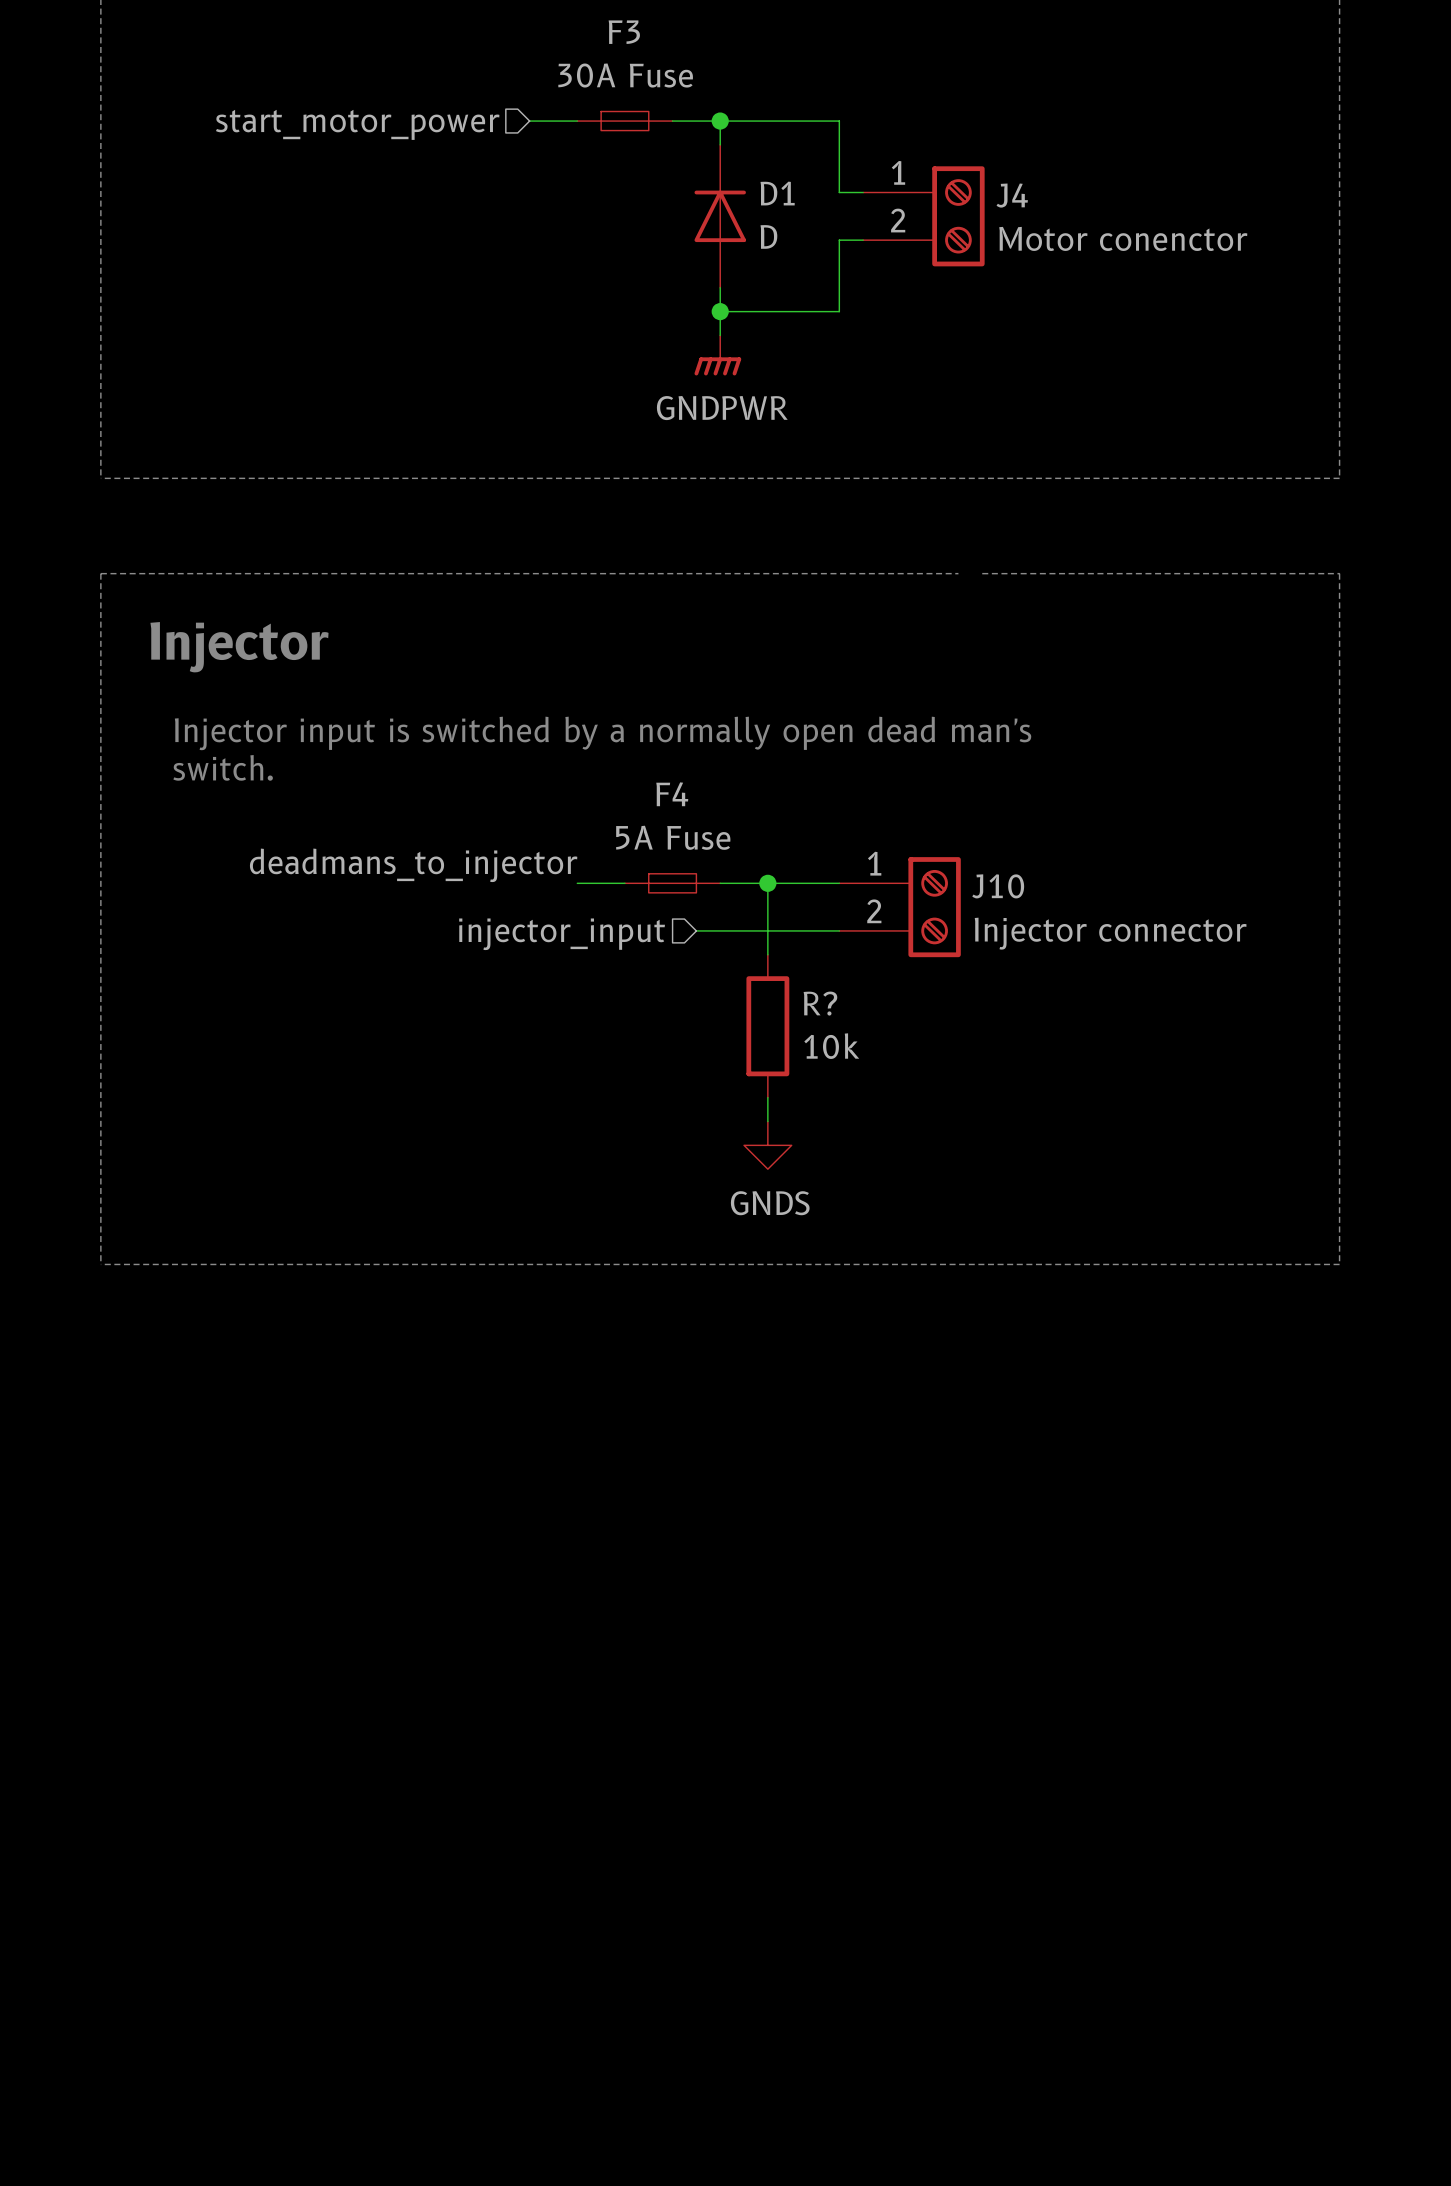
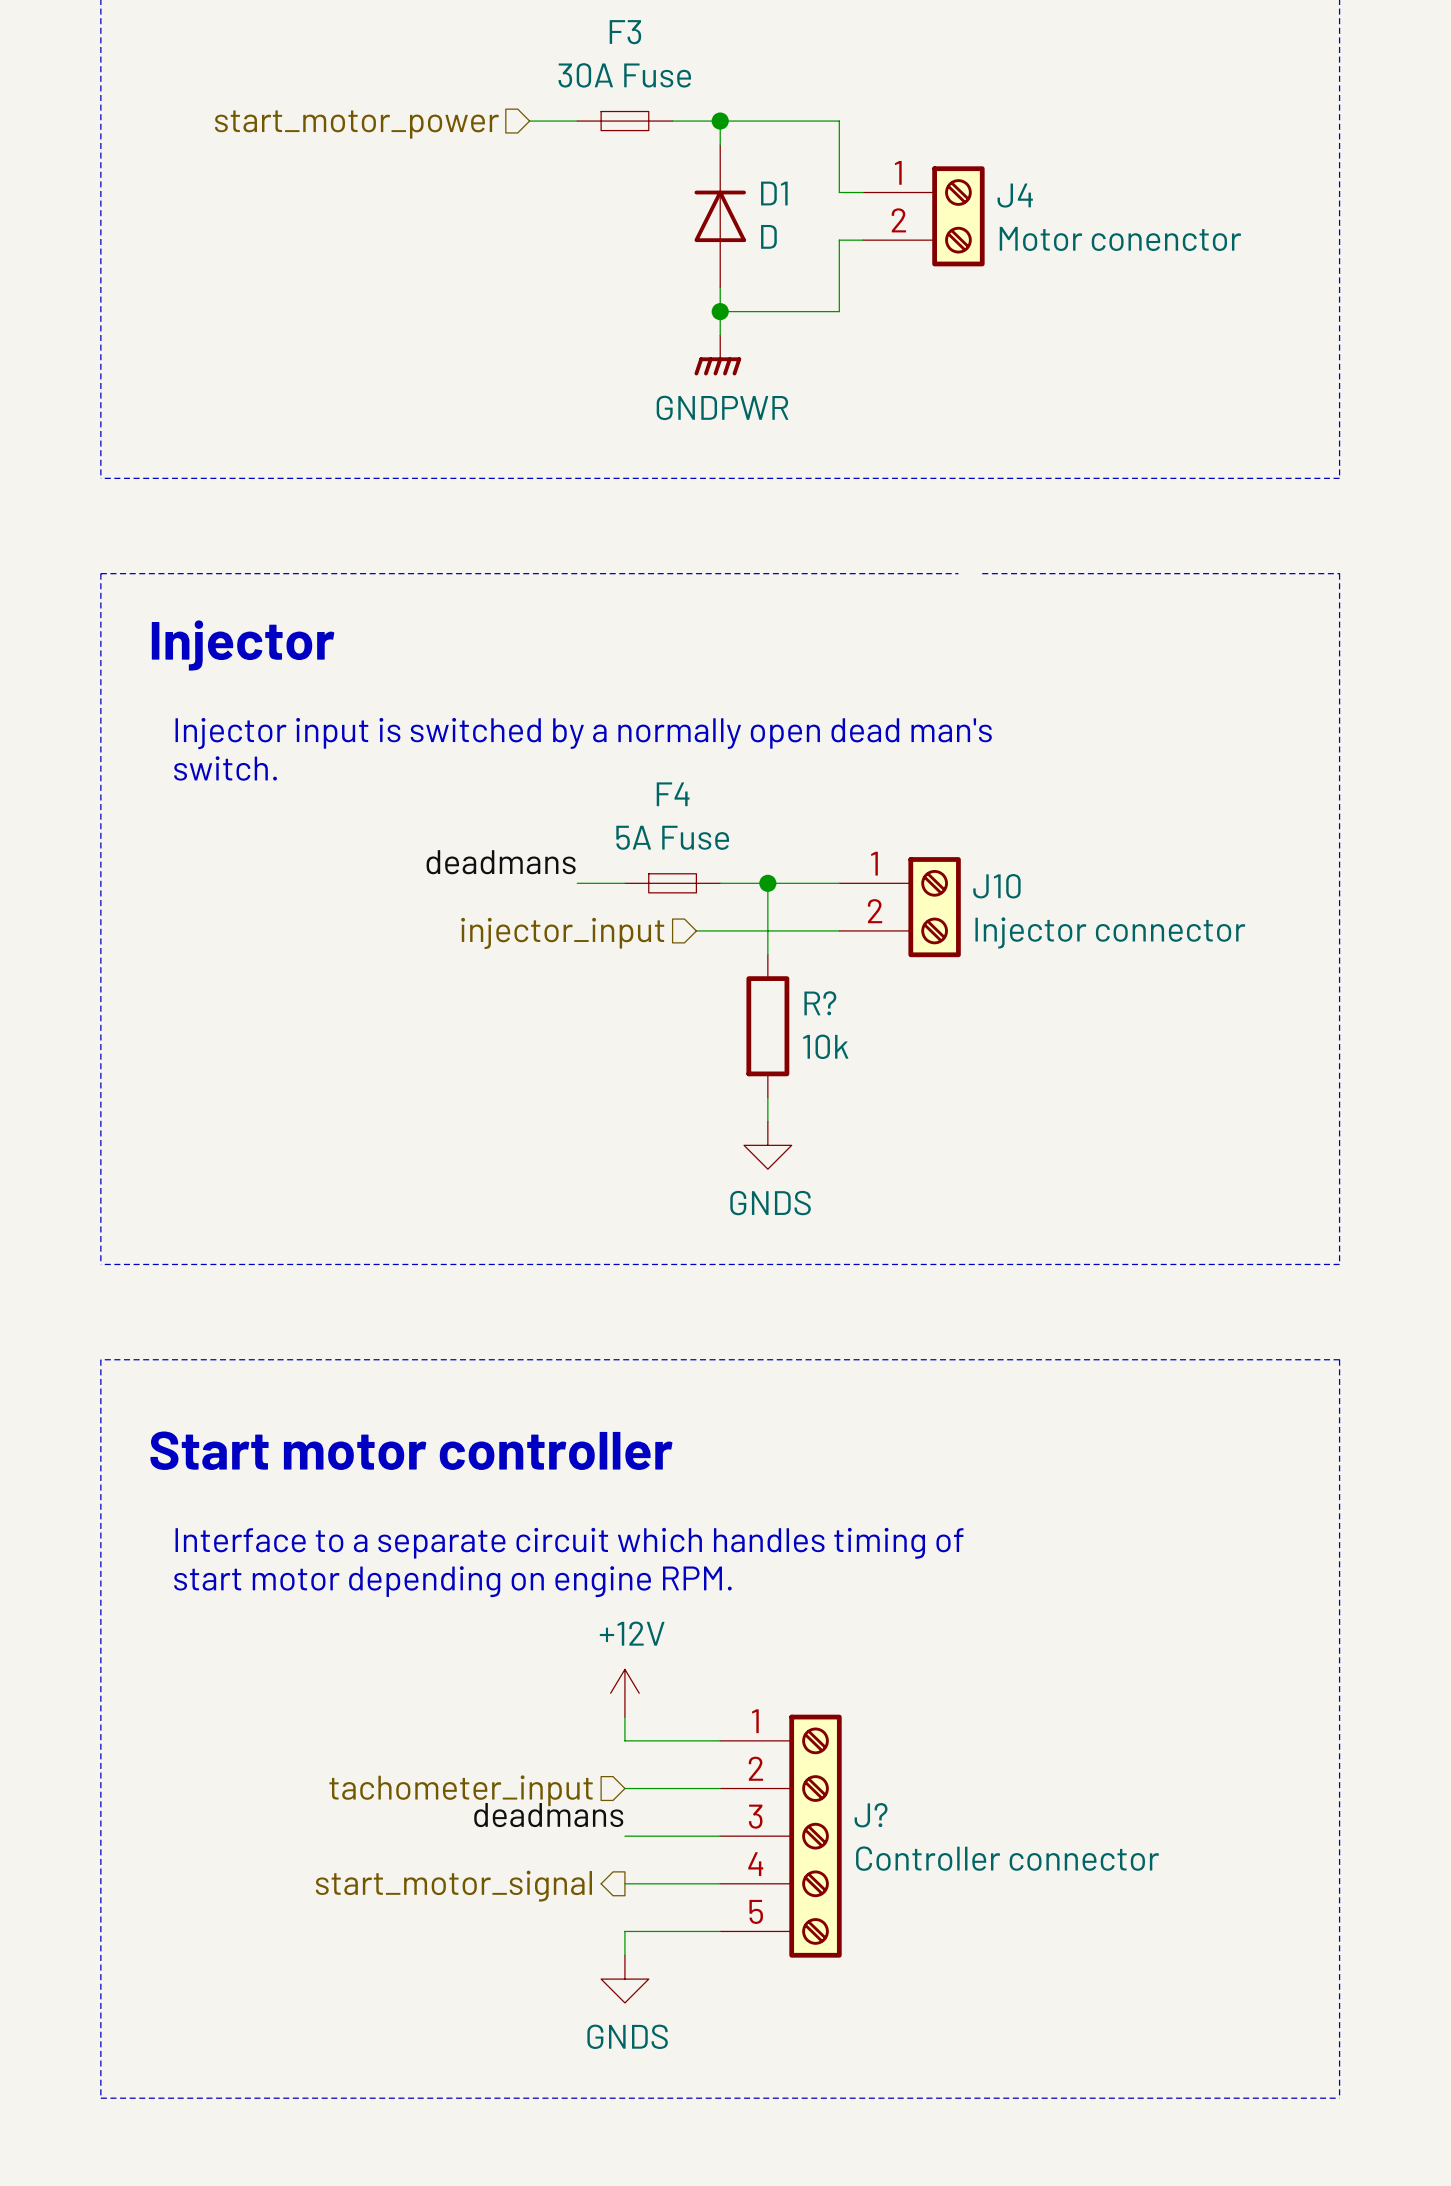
label: deadmans_to_injector (413, 865) -> deadmans (501, 862)
line: none -> (100, 1359) (1339, 1359) (1339, 2098) (100, 2098) (100, 1359)
text: none -> Start motor controller (411, 1450)
text: none -> Interface to a separate circuit which handles timing of (569, 1543)
text: none -> start motor depending on engine RPM. (452, 1581)
power symbol: none -> +12V (624, 1693)
wire: none -> (624, 1717) (624, 1740) (720, 1740)
wire: none -> (624, 1788) (720, 1788)
hierarchical label: none -> tachometer_input (461, 1790)
label: none -> deadmans (548, 1815)
wire: none -> (624, 1836) (720, 1836)
J?: none -> Controller connector (780, 1836)
wire: none -> (624, 1883) (720, 1883)
hierarchical label: none -> start_motor_signal (453, 1886)
wire: none -> (720, 1931) (624, 1931) (624, 1955)
power symbol: none -> GNDS (624, 1979)

